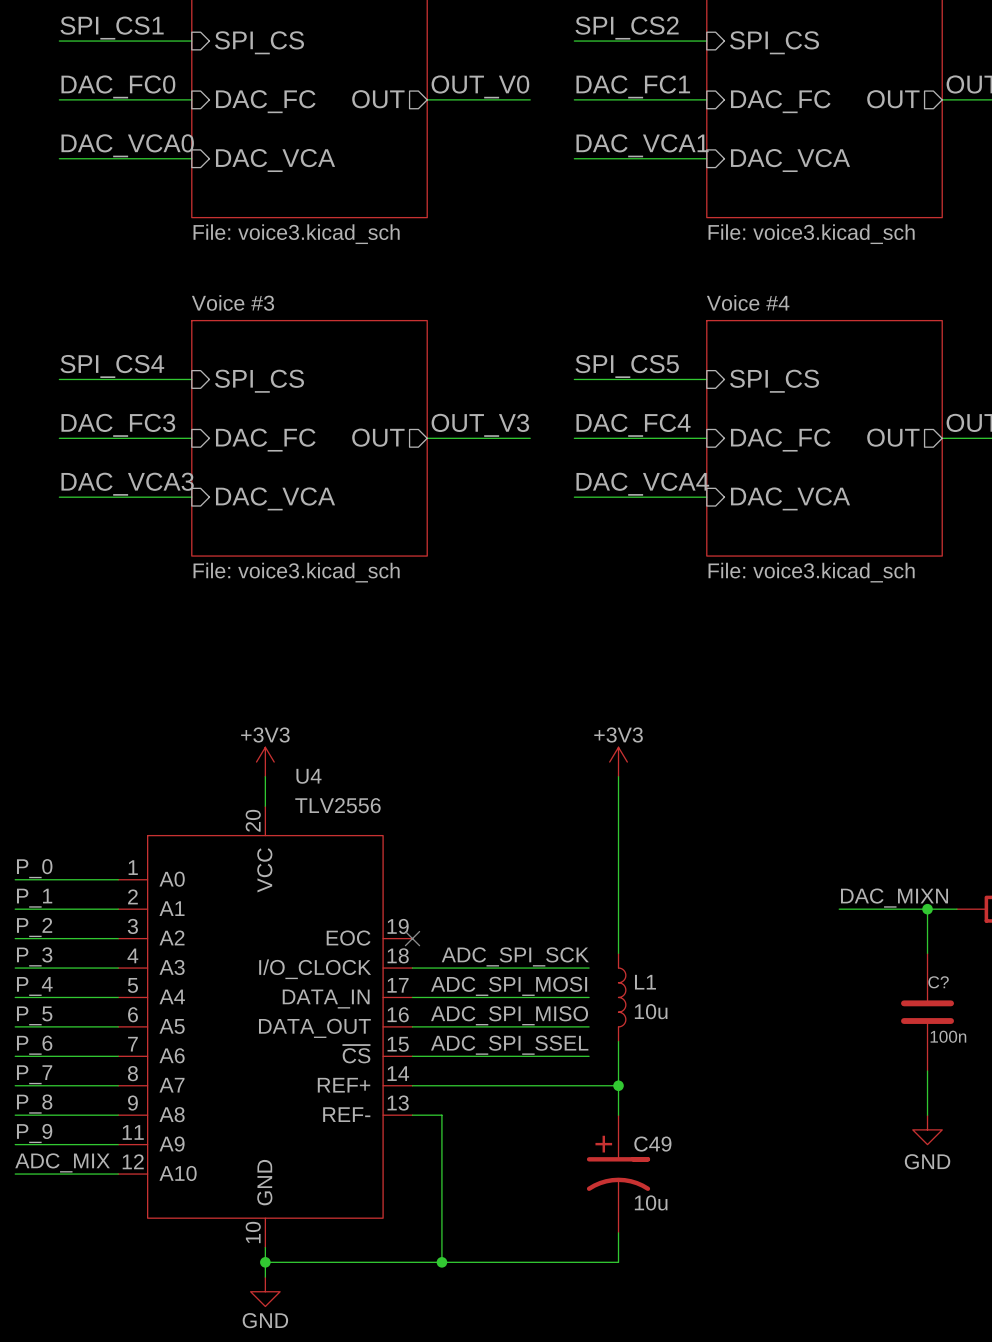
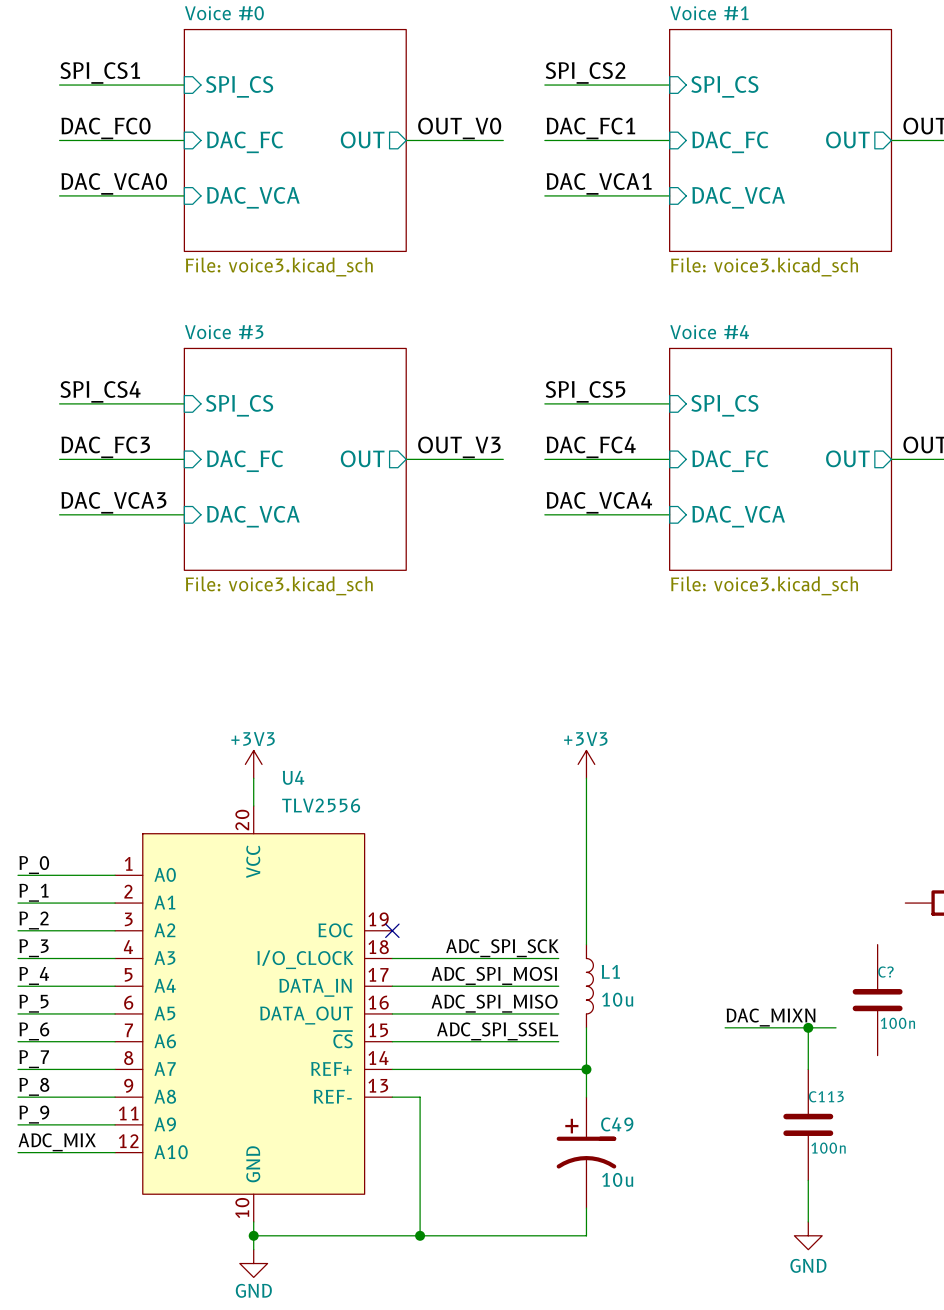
label position: DAC_MIXN (894, 898) -> DAC_MIXN (771, 1017)
wire: (839, 909) (956, 909) -> (725, 1027) (836, 1027)
wire: (927, 909) (927, 953) -> (808, 1027) (808, 1069)
junction: (927, 909) -> none
junction: none -> (808, 1027)
wire: (927, 1071) (927, 1115) -> (808, 1180) (808, 1221)
power symbol position: GND (927, 1129) -> GND (808, 1235)
C113: none -> 100n (808, 1124)

